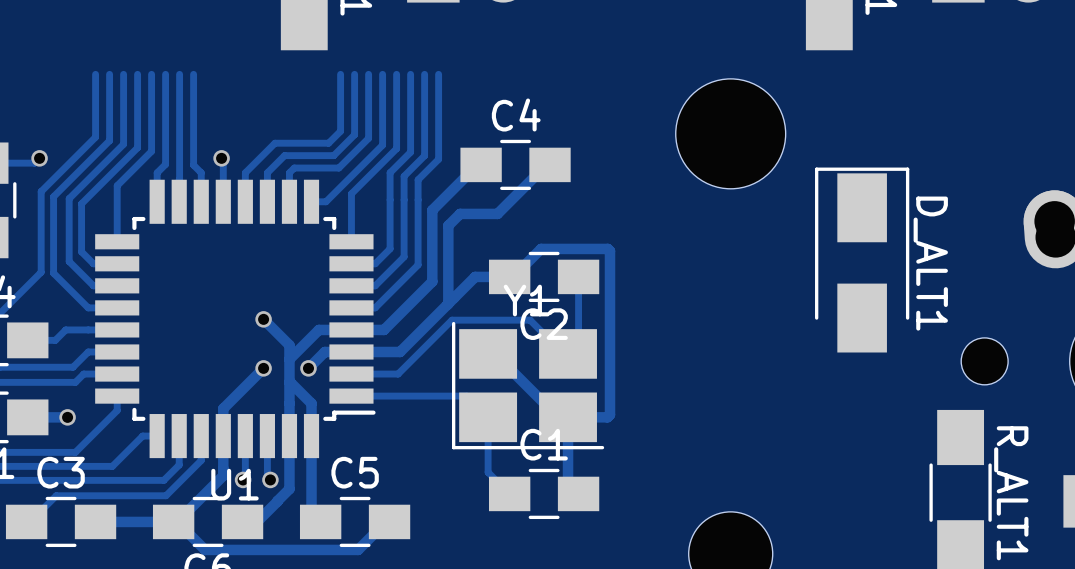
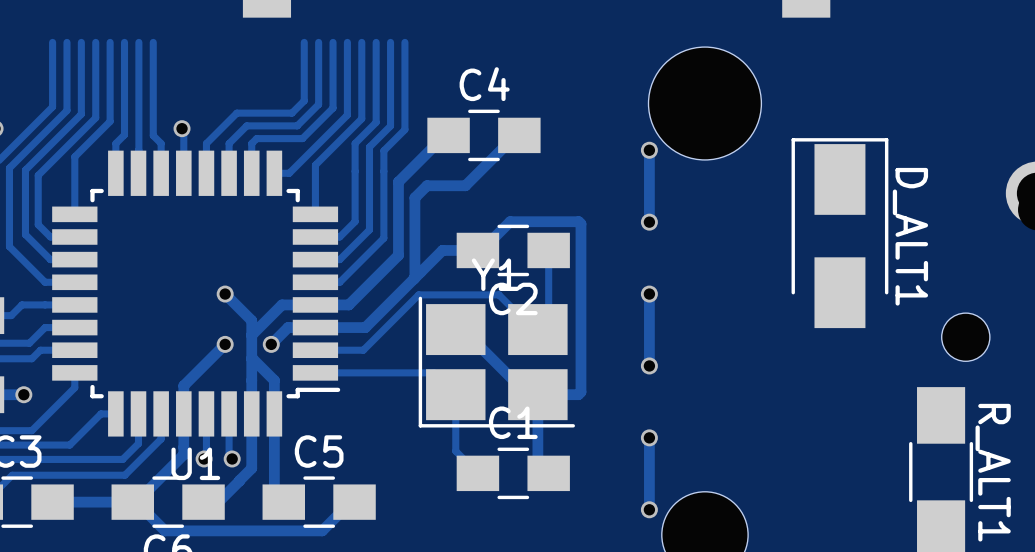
track: none -> (649, 150) (649, 222)
via: none -> (649, 150)
via: none -> (649, 222)
track: none -> (649, 294) (649, 365)
via: none -> (649, 294)
via: none -> (649, 365)
track: none -> (649, 437) (649, 509)
via: none -> (649, 437)
via: none -> (649, 509)

